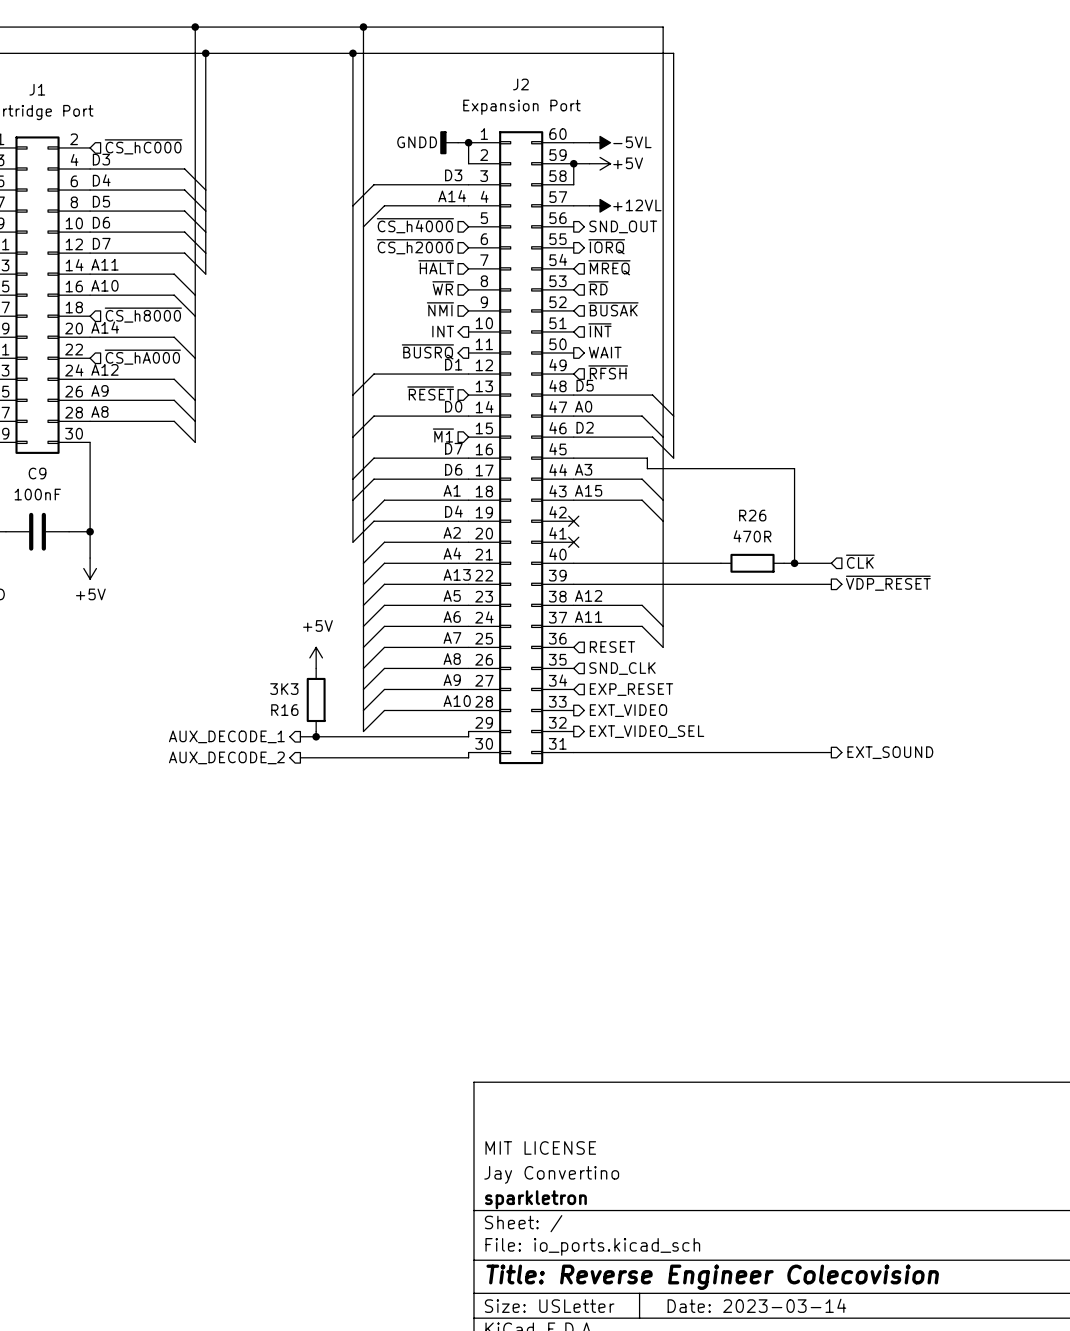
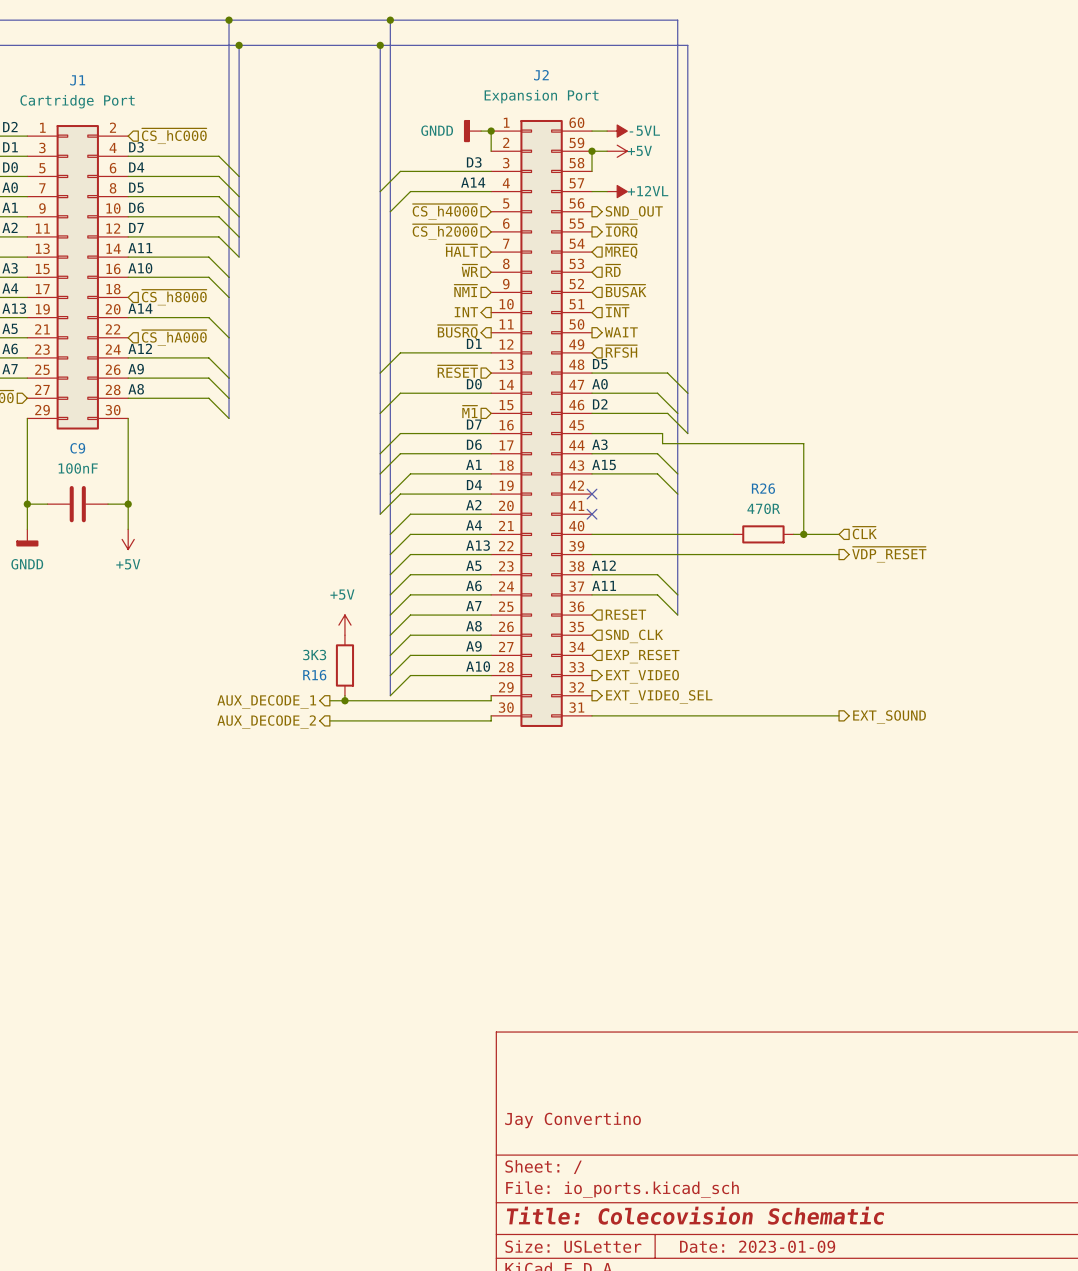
title block: MIT LICENSE (540, 1147) -> none
title block: sparkletron (535, 1199) -> none
title block: Title: Reverse Engineer Colecovision (712, 1277) -> Title: Colecovision Schematic (695, 1215)
title block: Date: 2023-03-14 (756, 1305) -> Date: 2023-01-09 (757, 1246)

